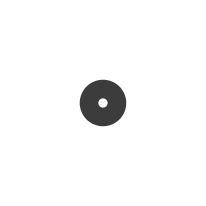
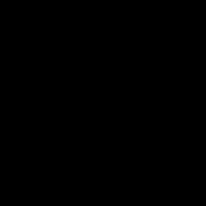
part: (102, 102) -> none

